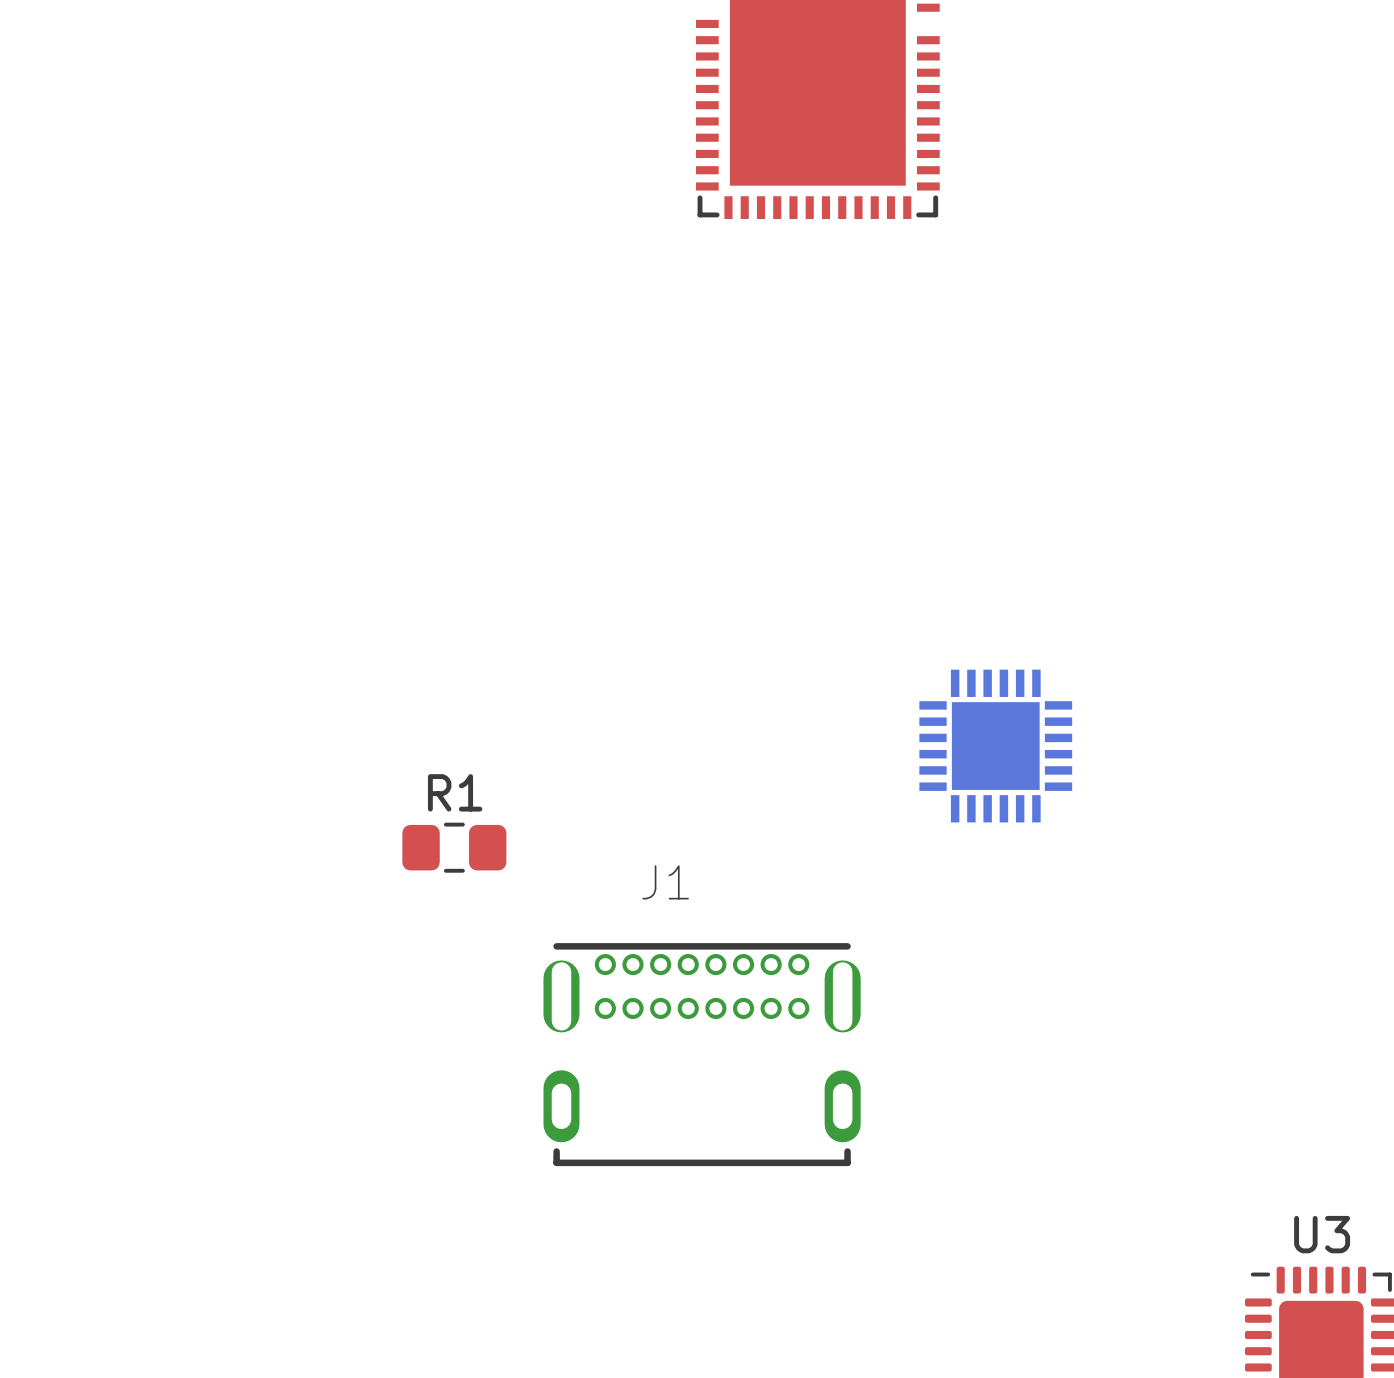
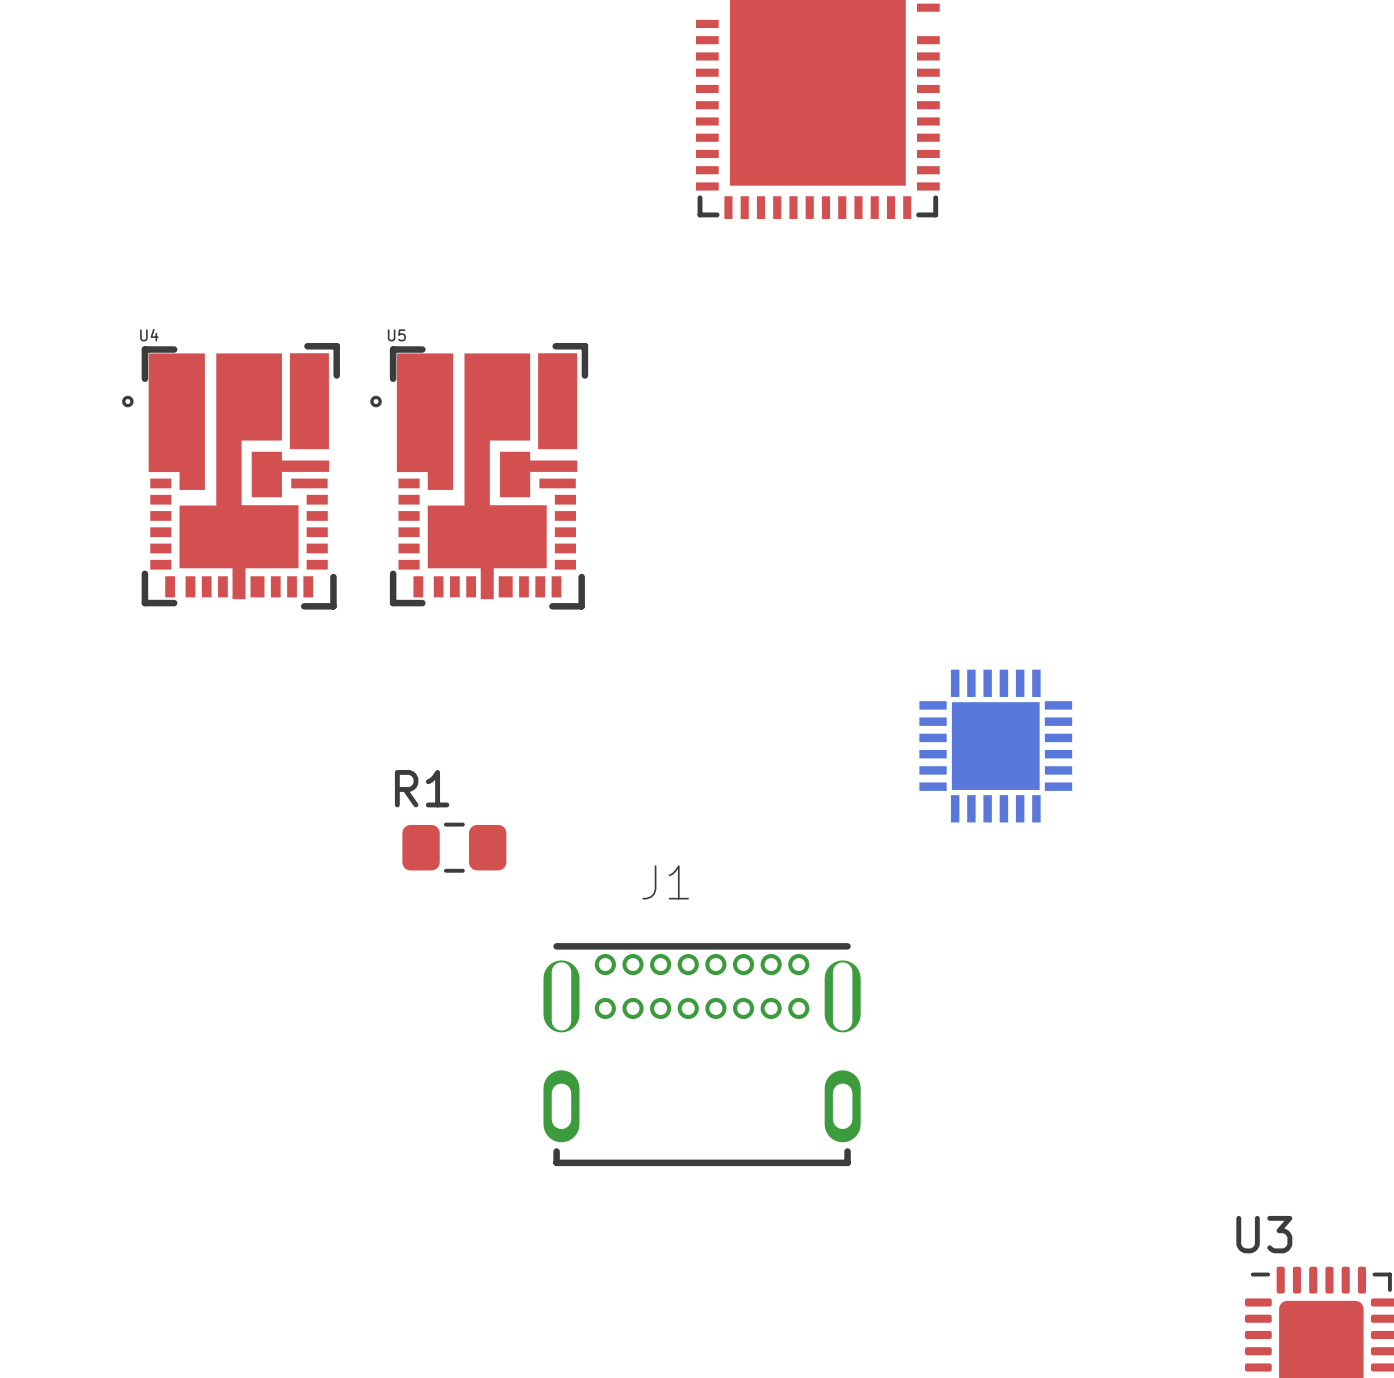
U4: none -> (231, 476)
U5: none -> (479, 476)
R1 name position: R1 (455, 792) -> R1 (422, 788)
U3 name position: U3 (1322, 1234) -> U3 (1264, 1234)

